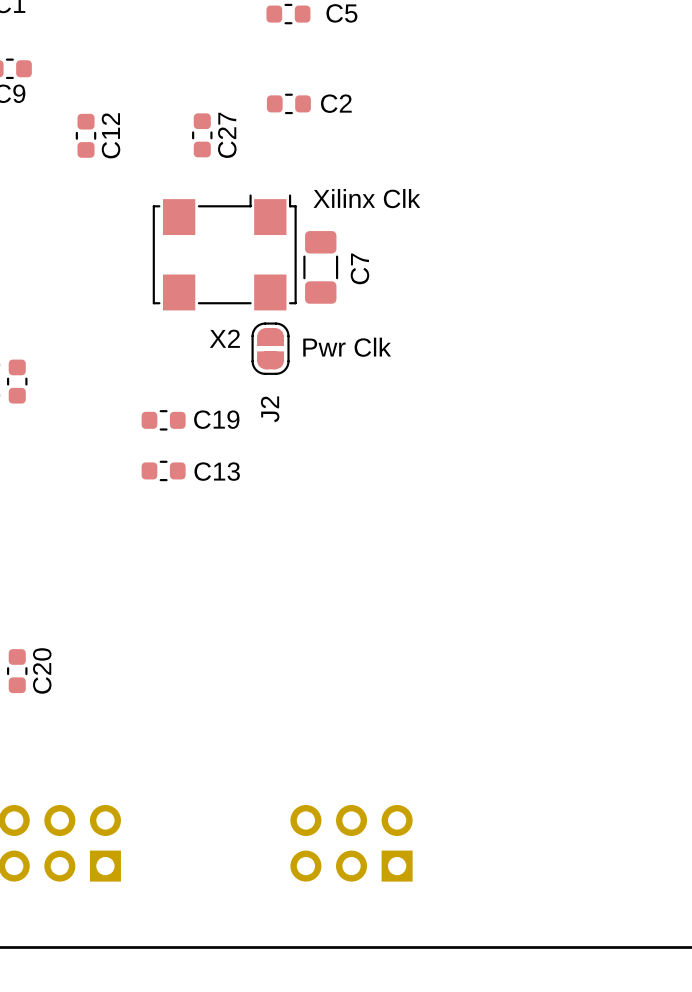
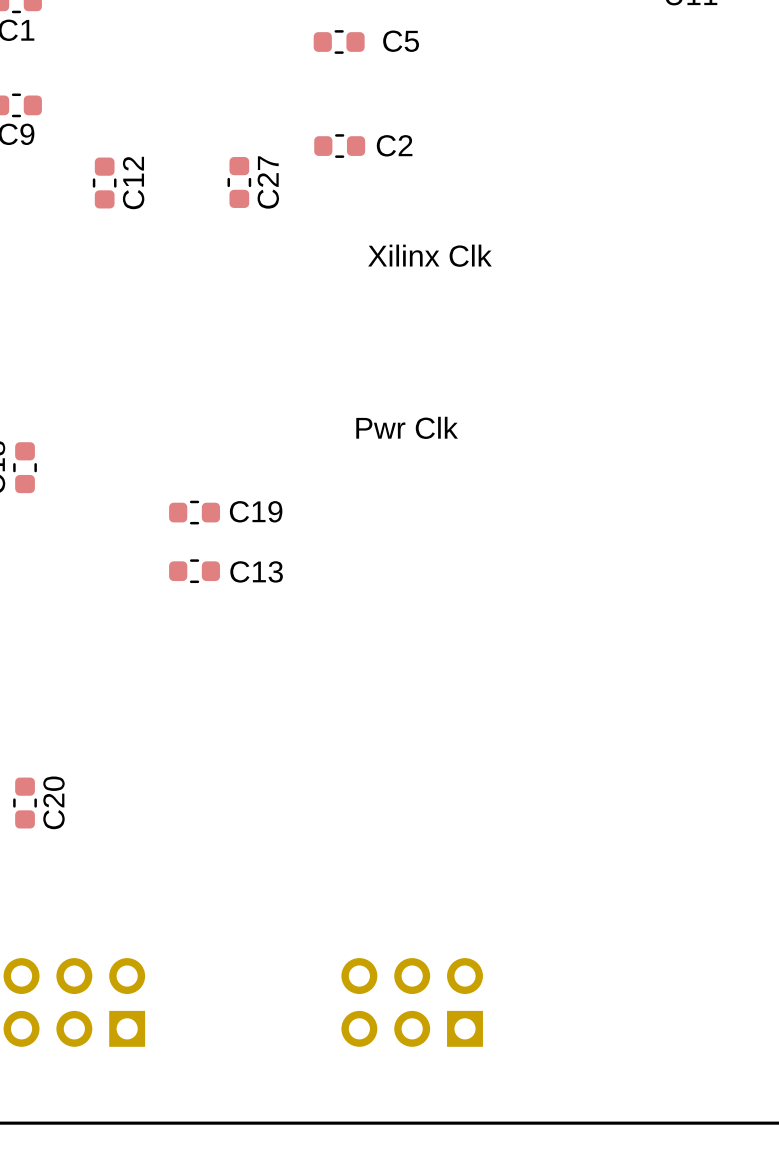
X2: (224, 252) -> none
C7: (320, 267) -> none
J2: (270, 348) -> none

